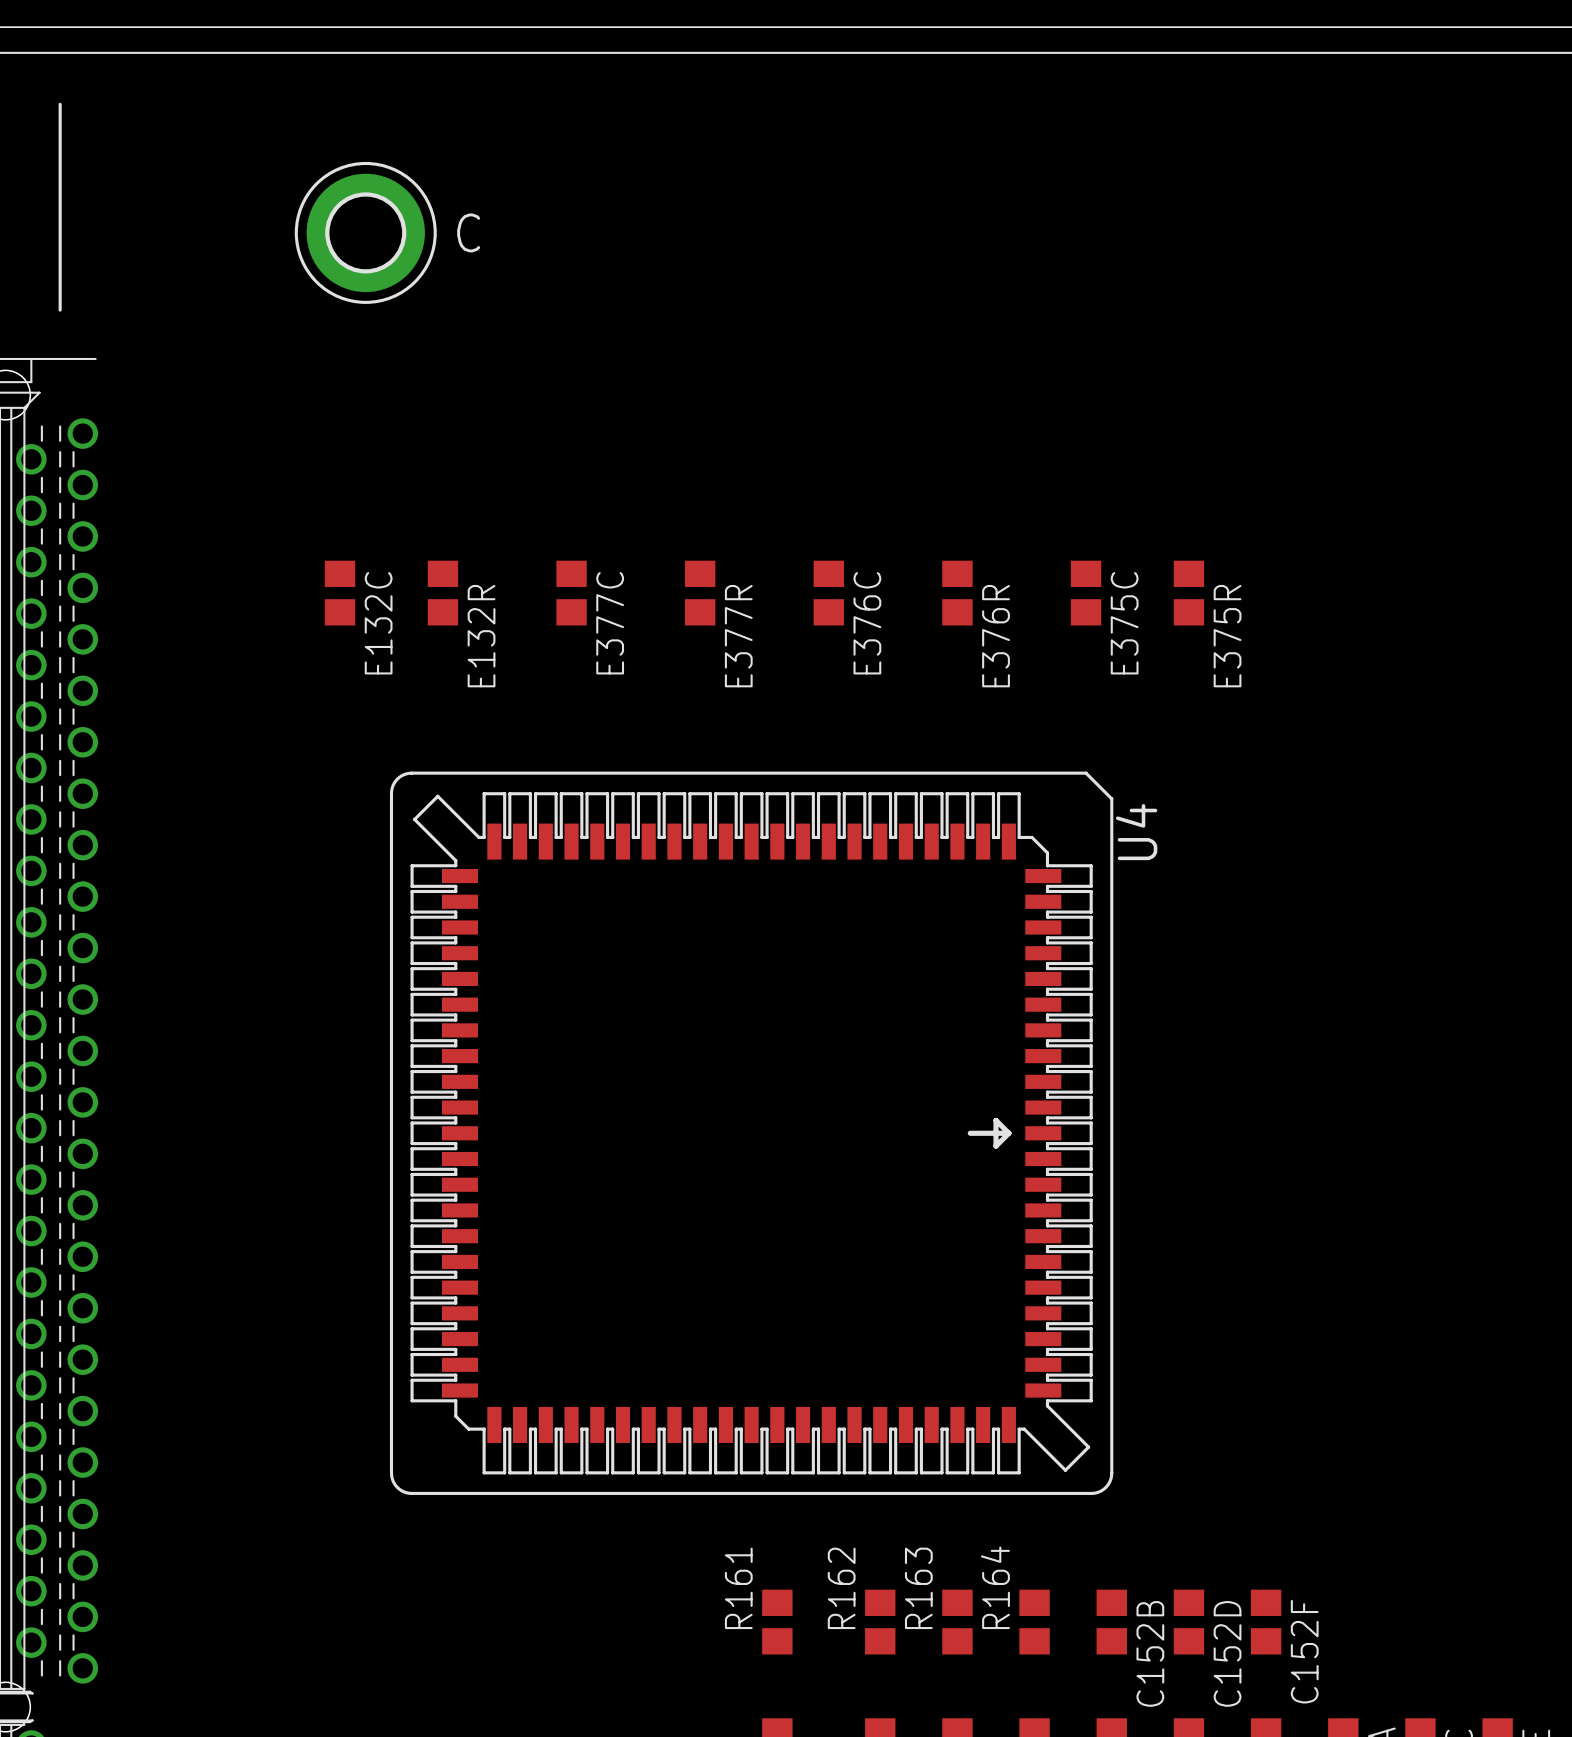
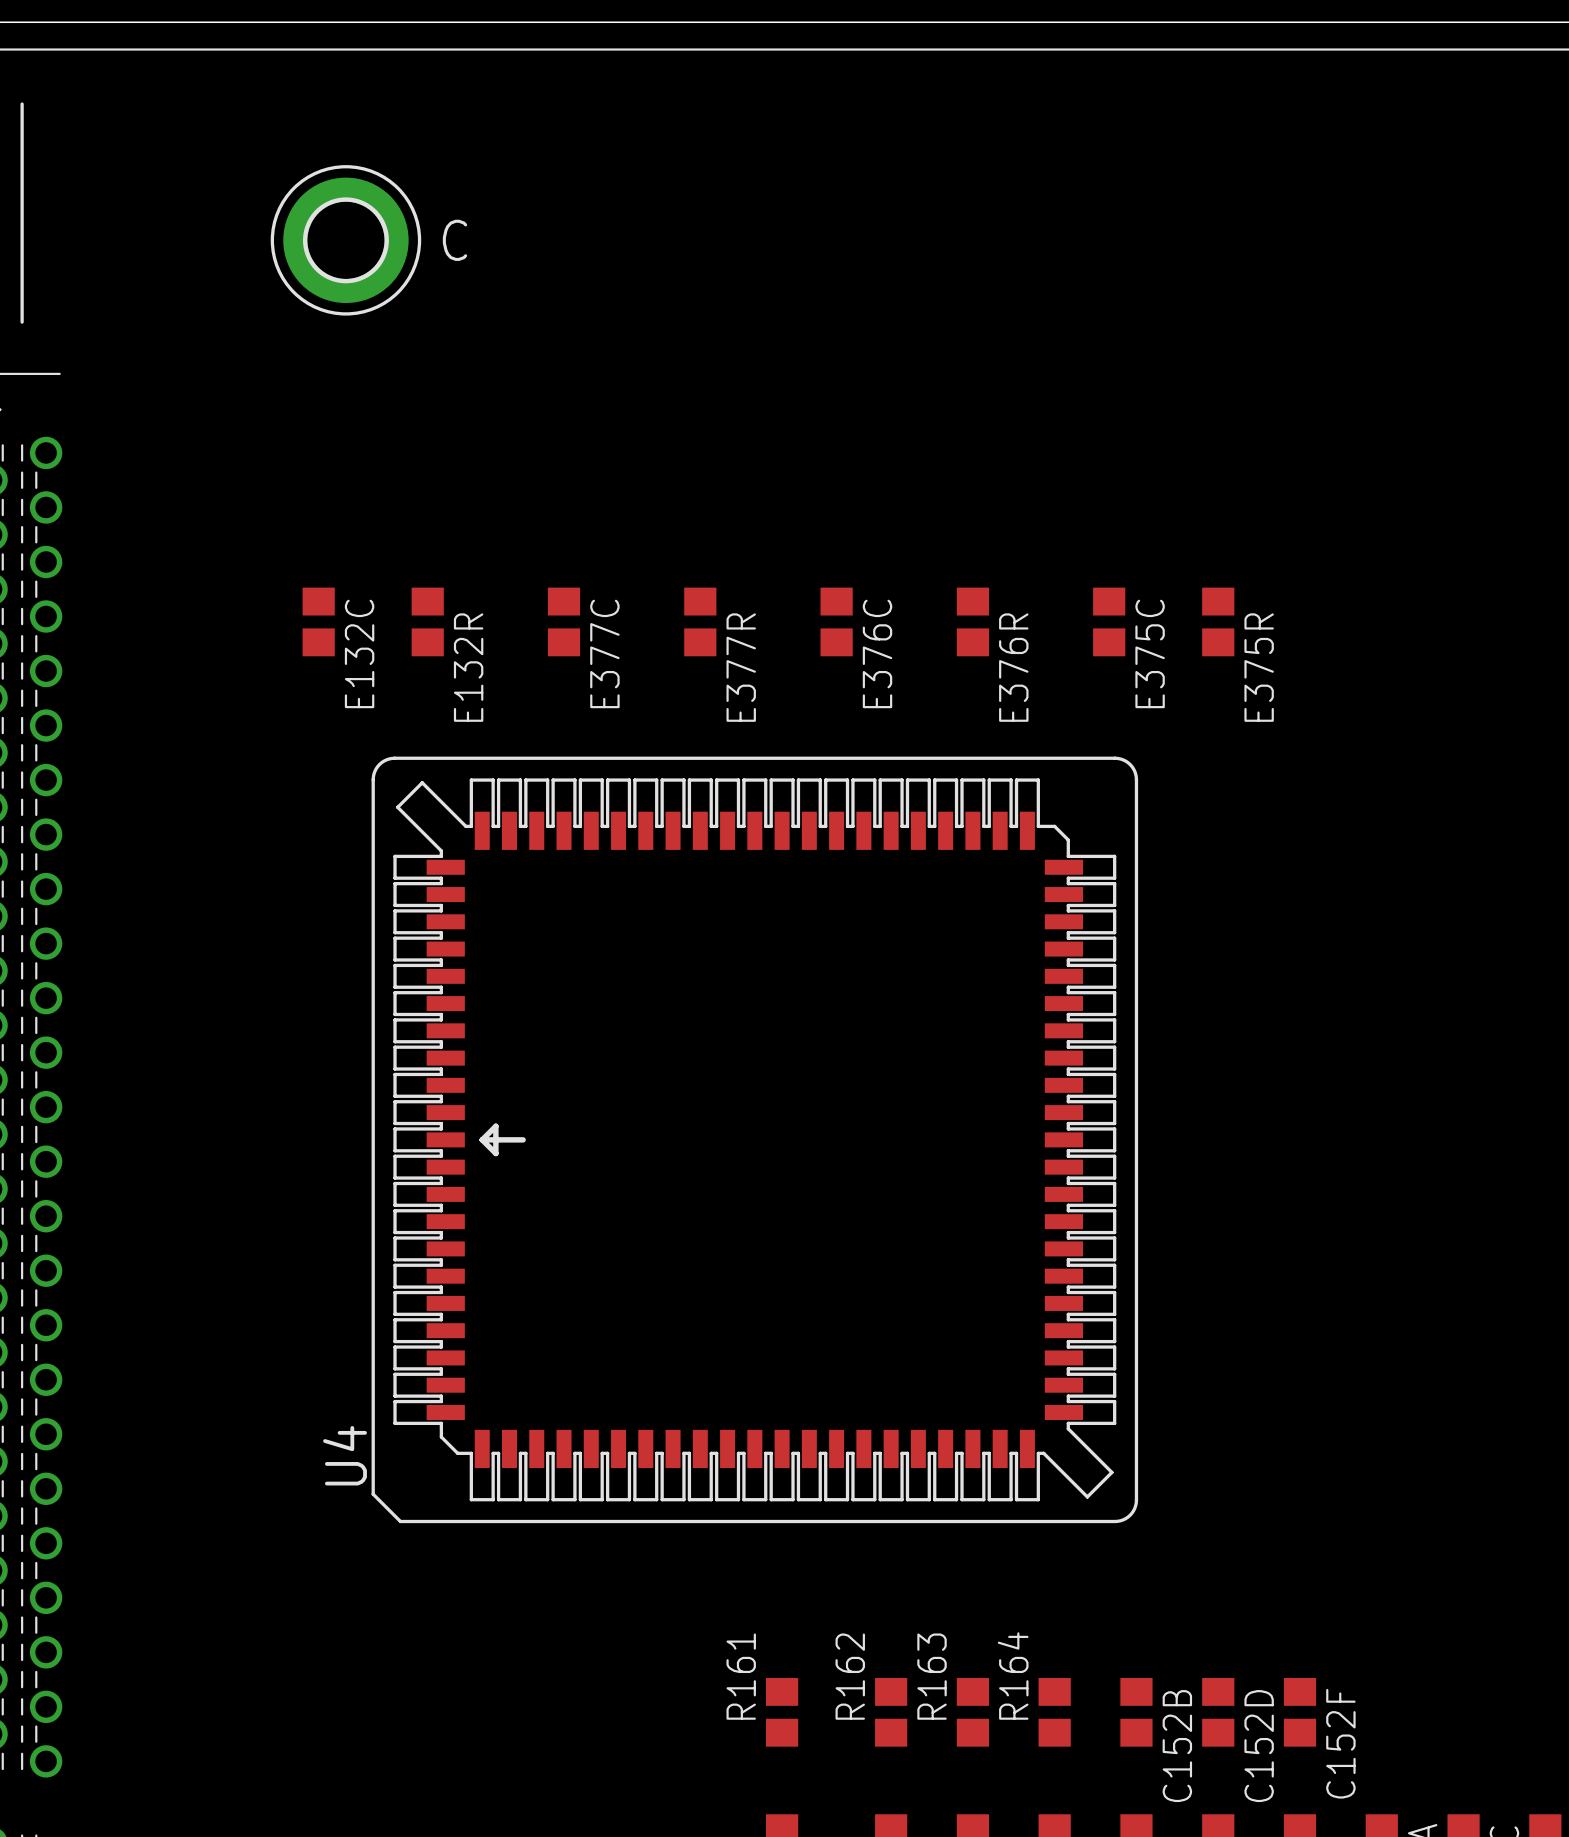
U4 rotation: 0° (751, 1133) -> 180° (754, 1139)

